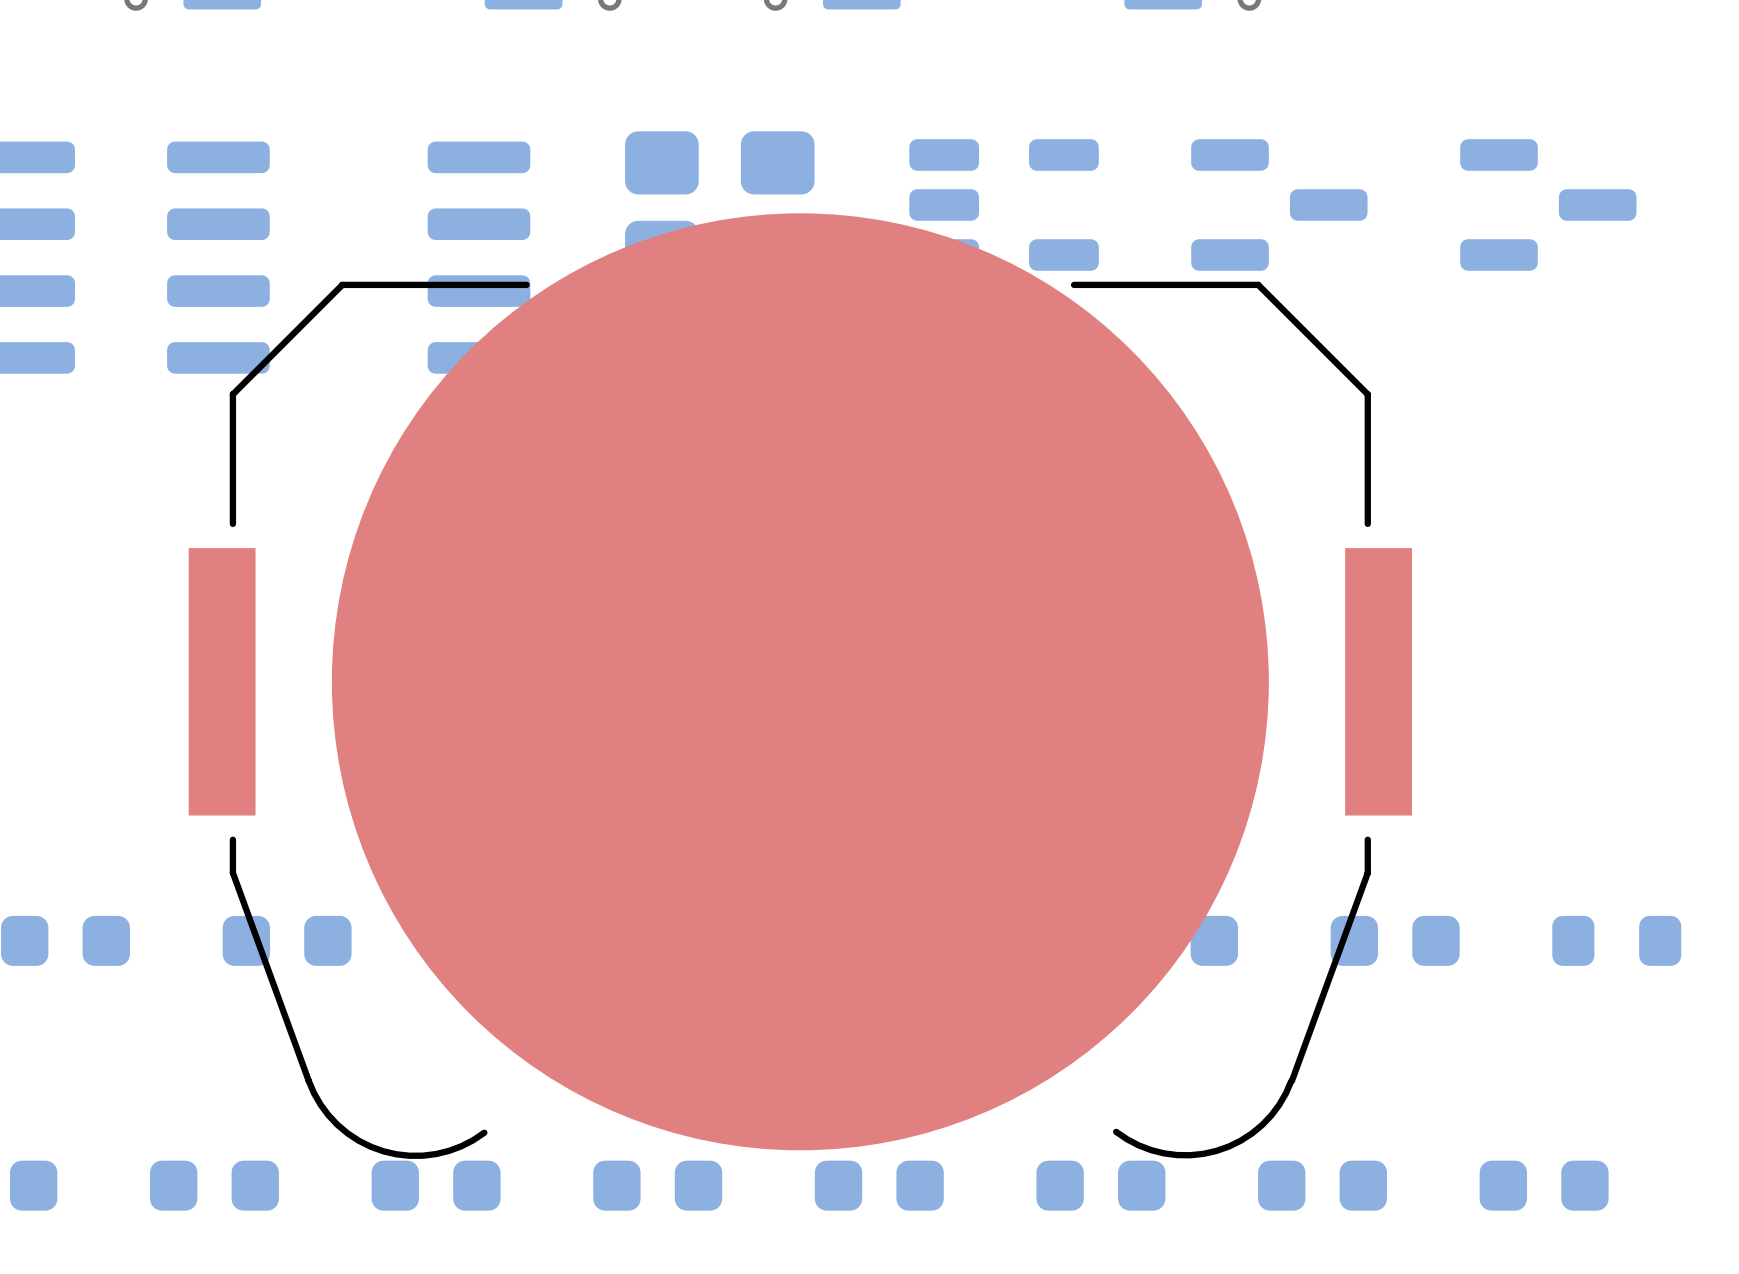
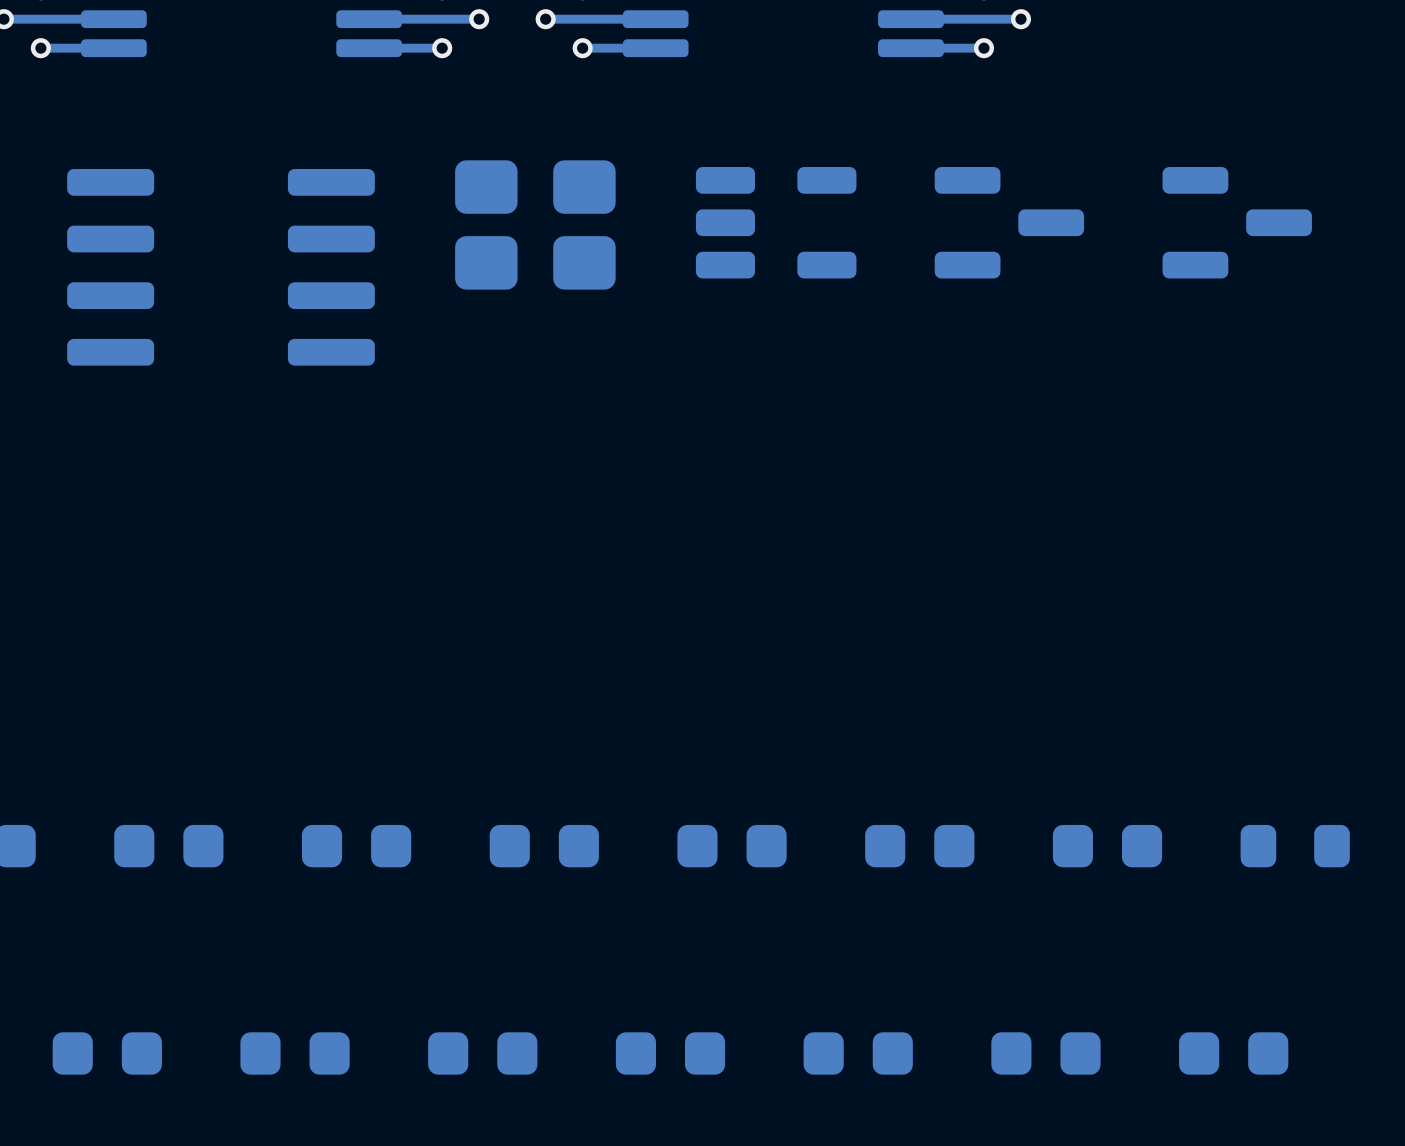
part: (800, 686) -> none

